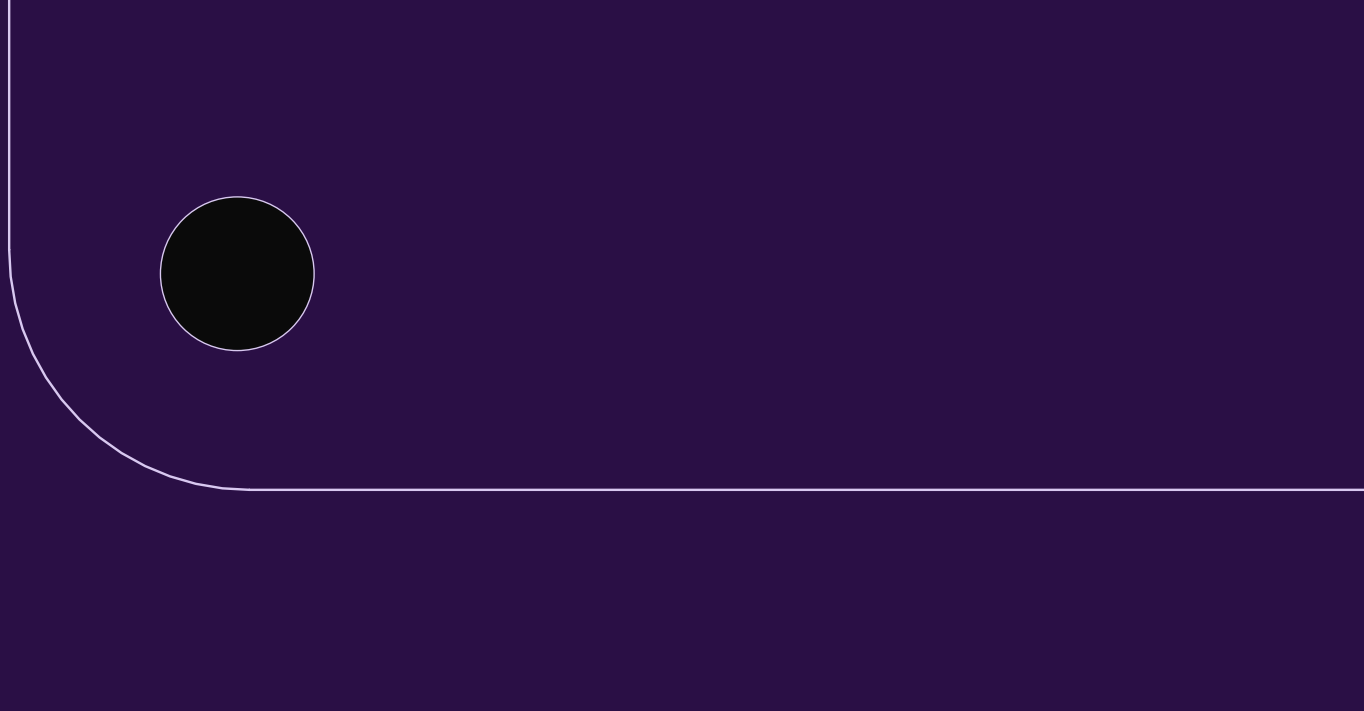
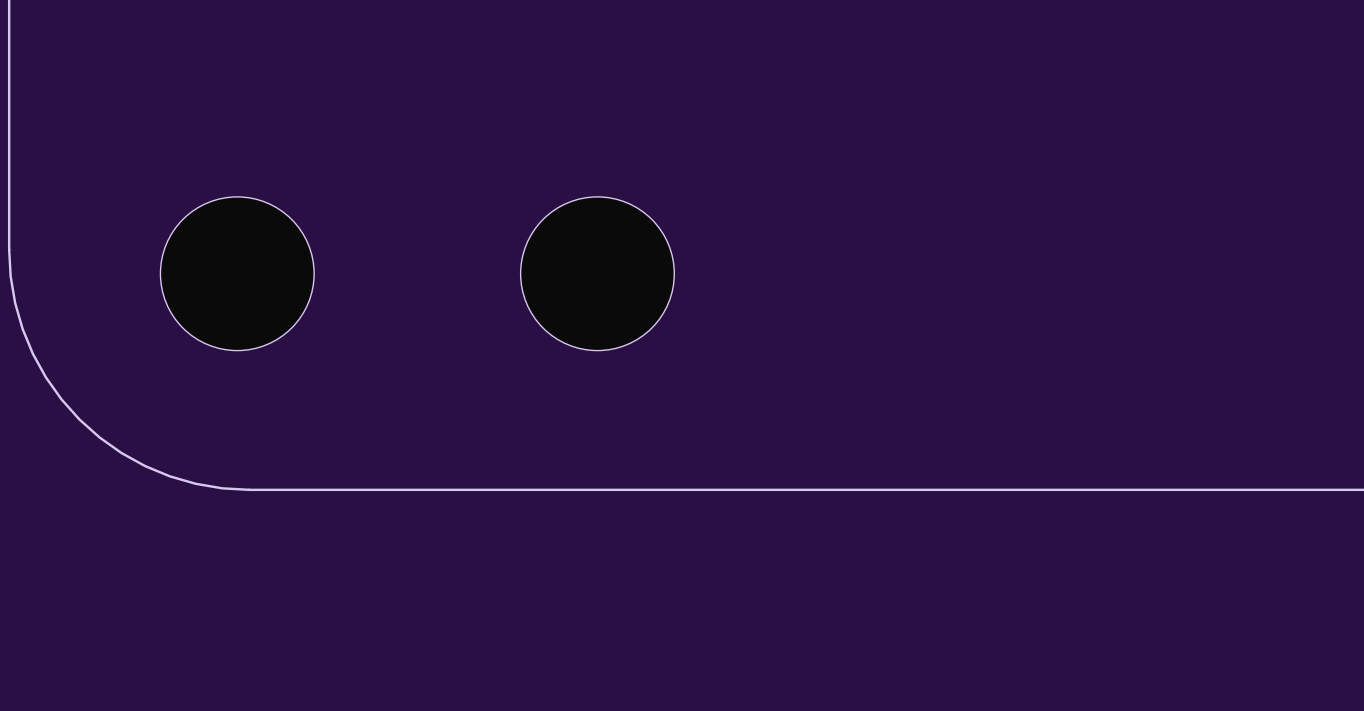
part: none -> (597, 273)

